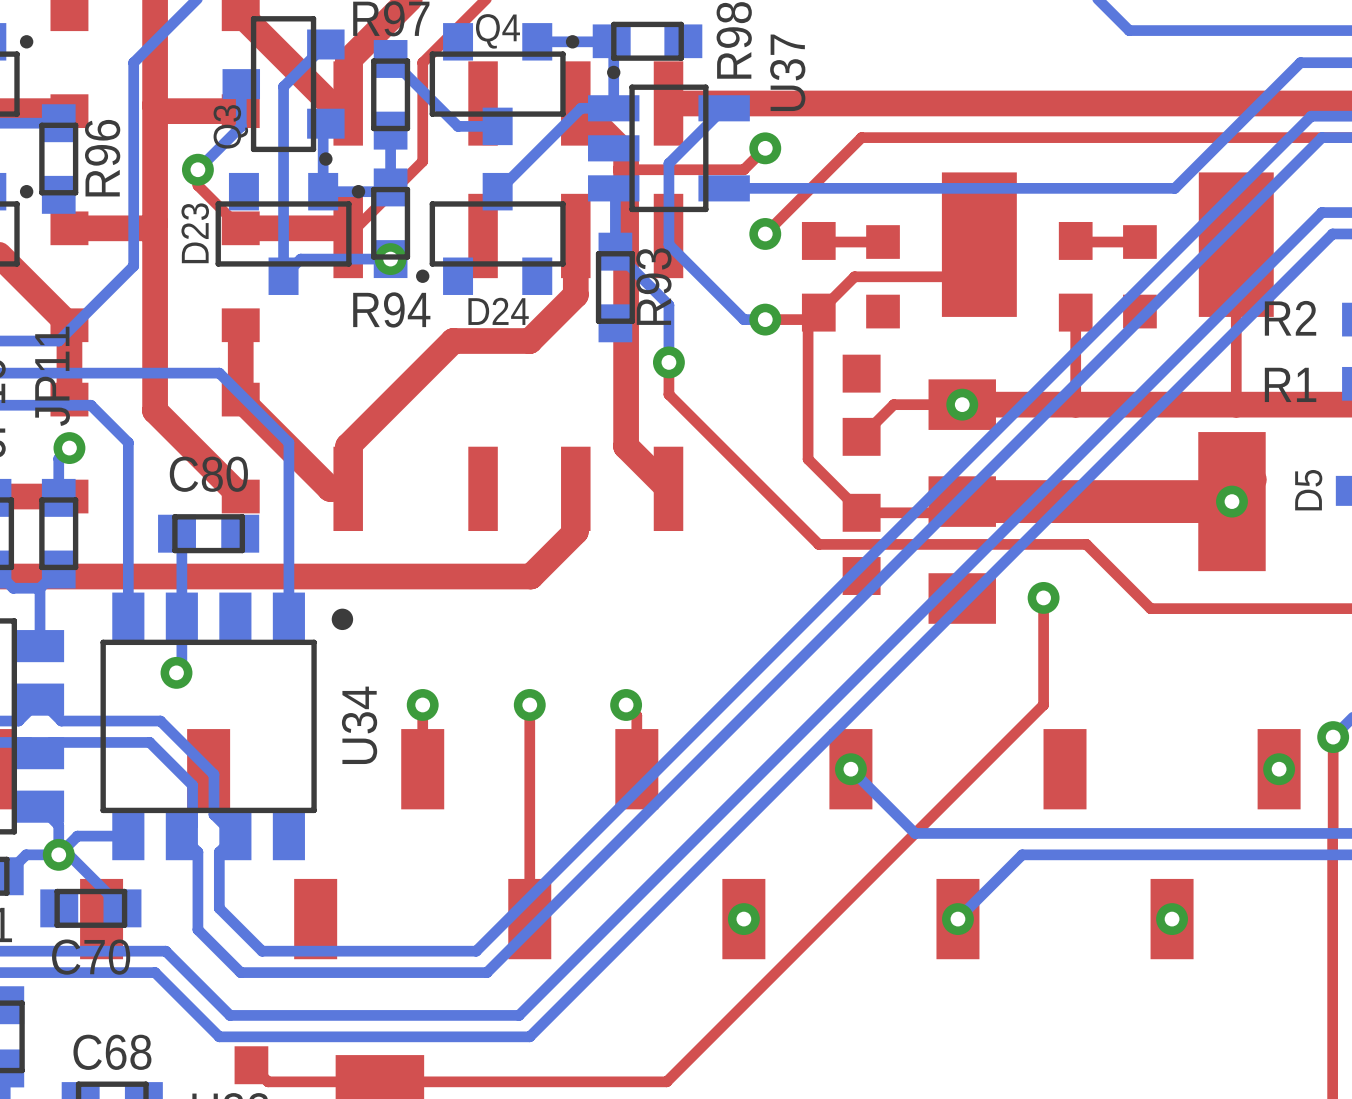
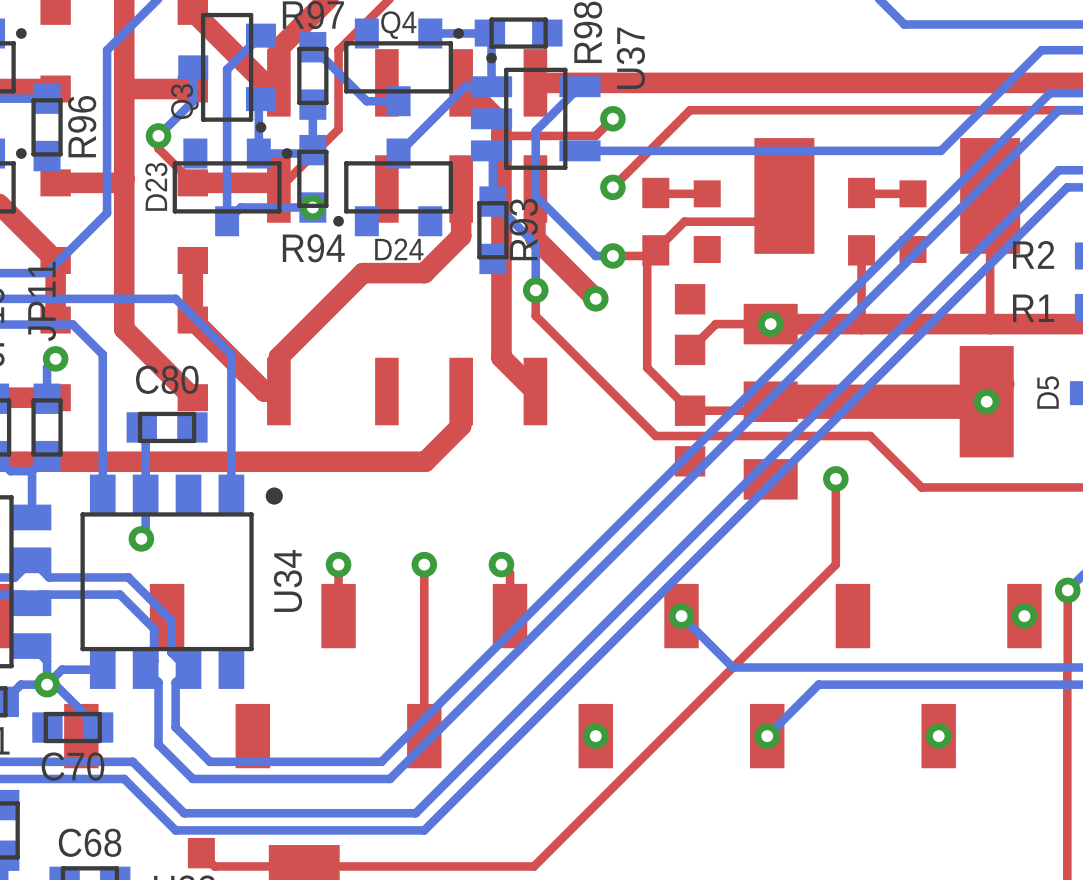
top track: none -> (535, 189) (535, 238) (595, 298)
via: none -> (595, 298)

